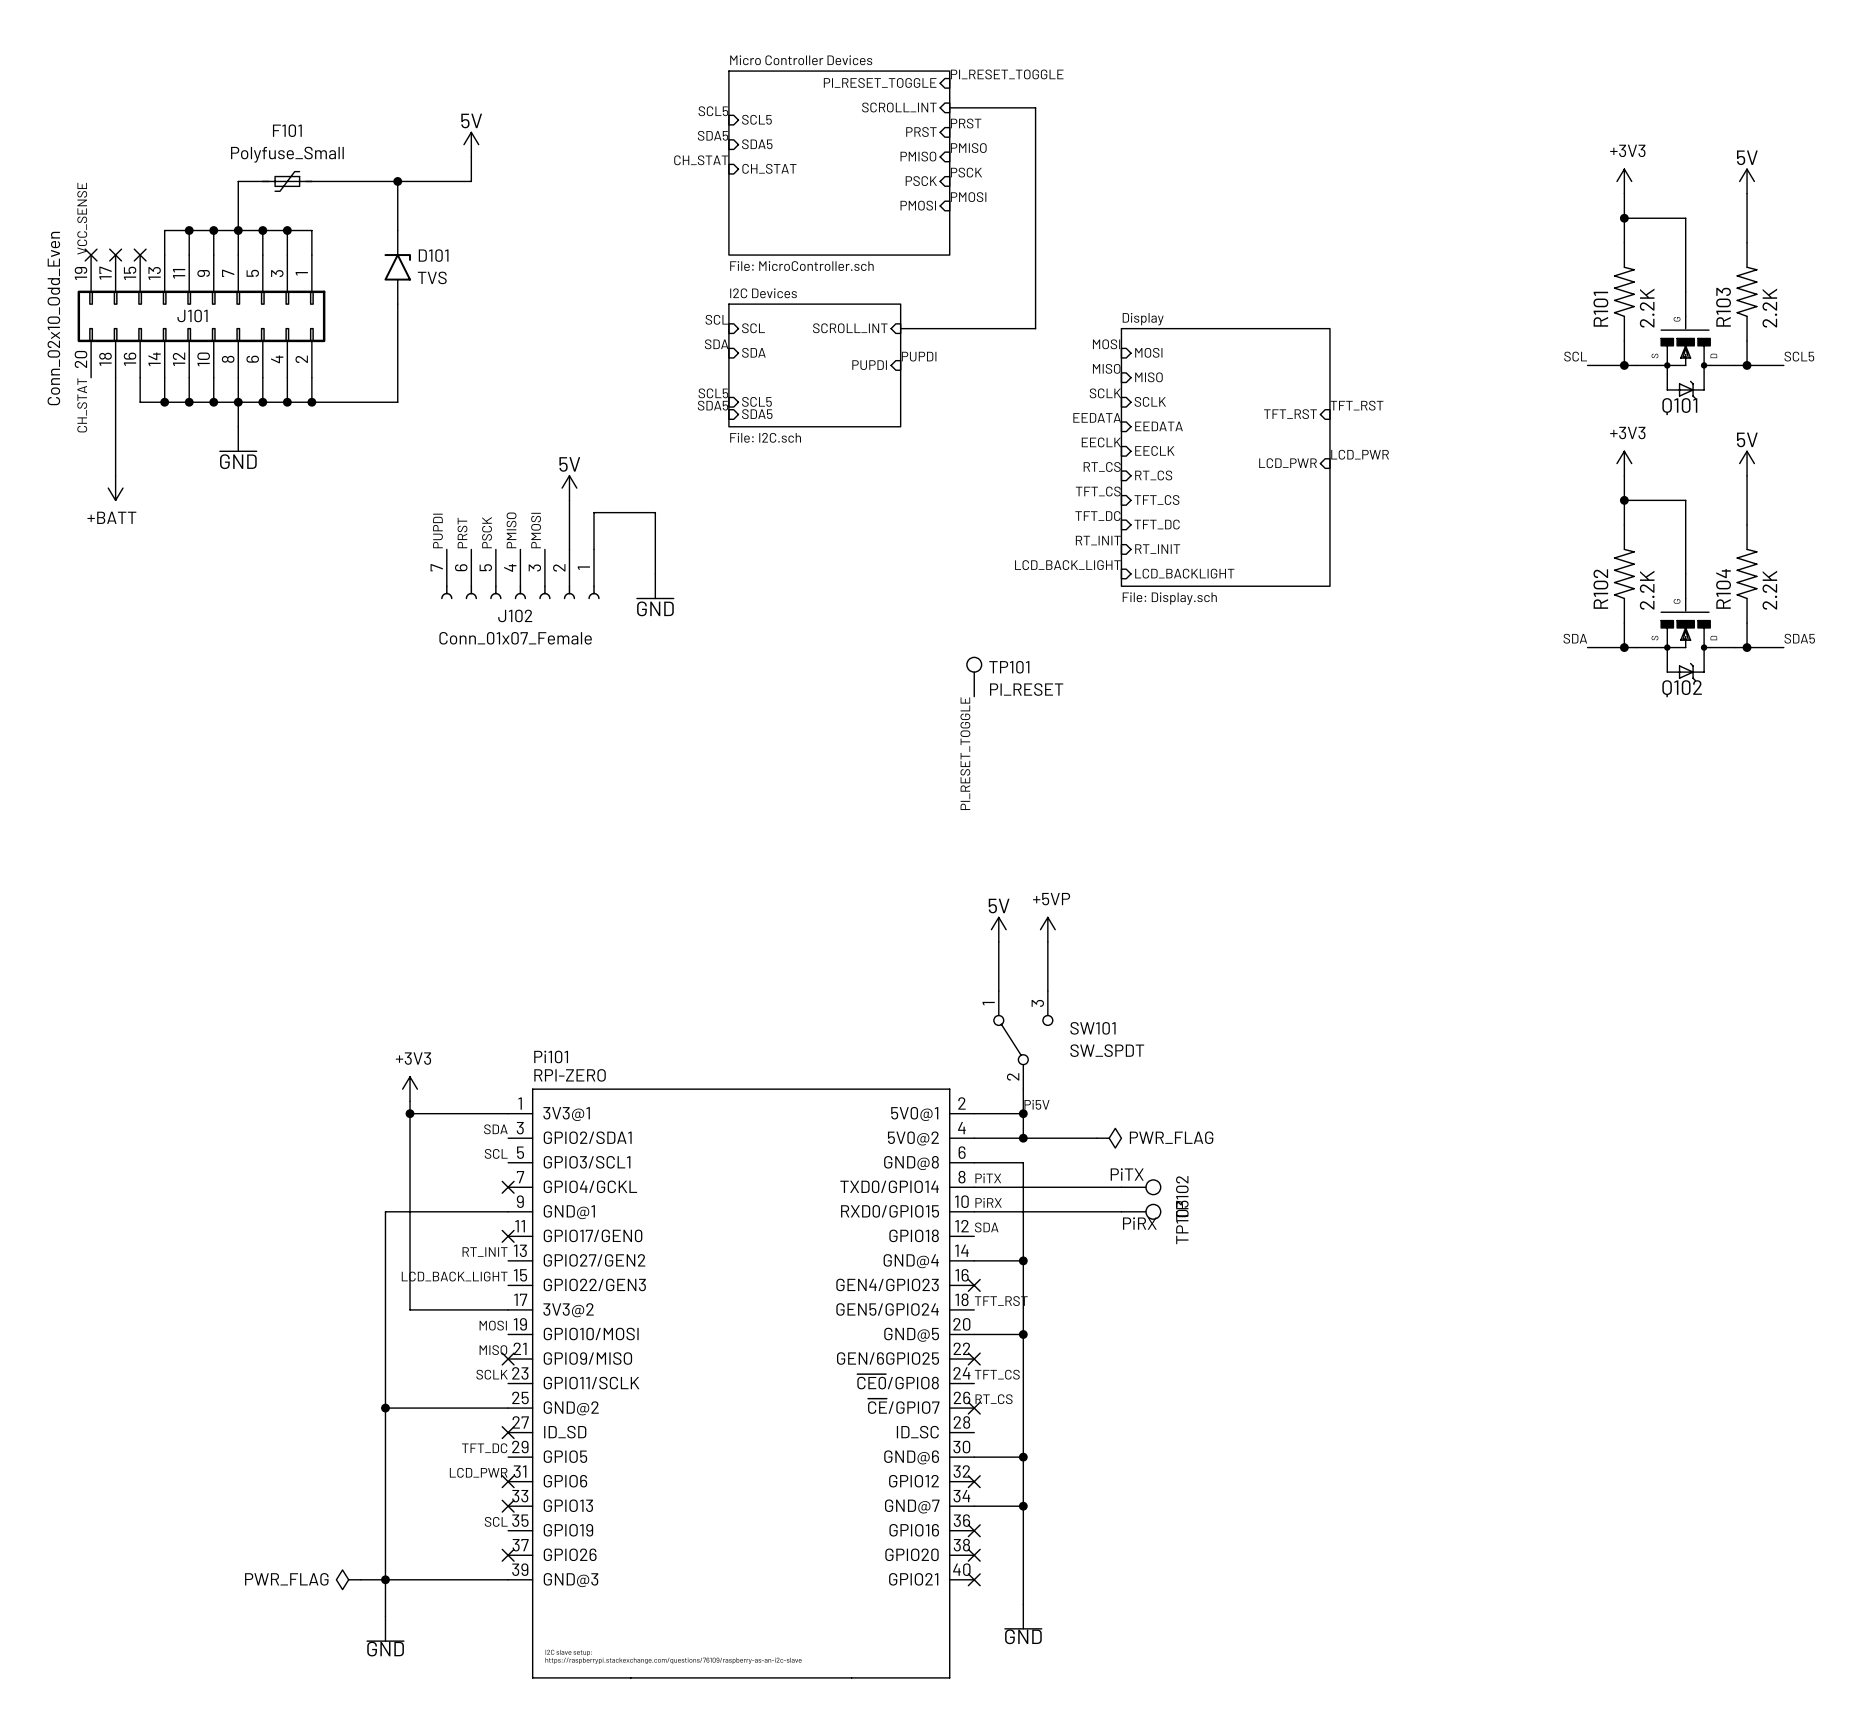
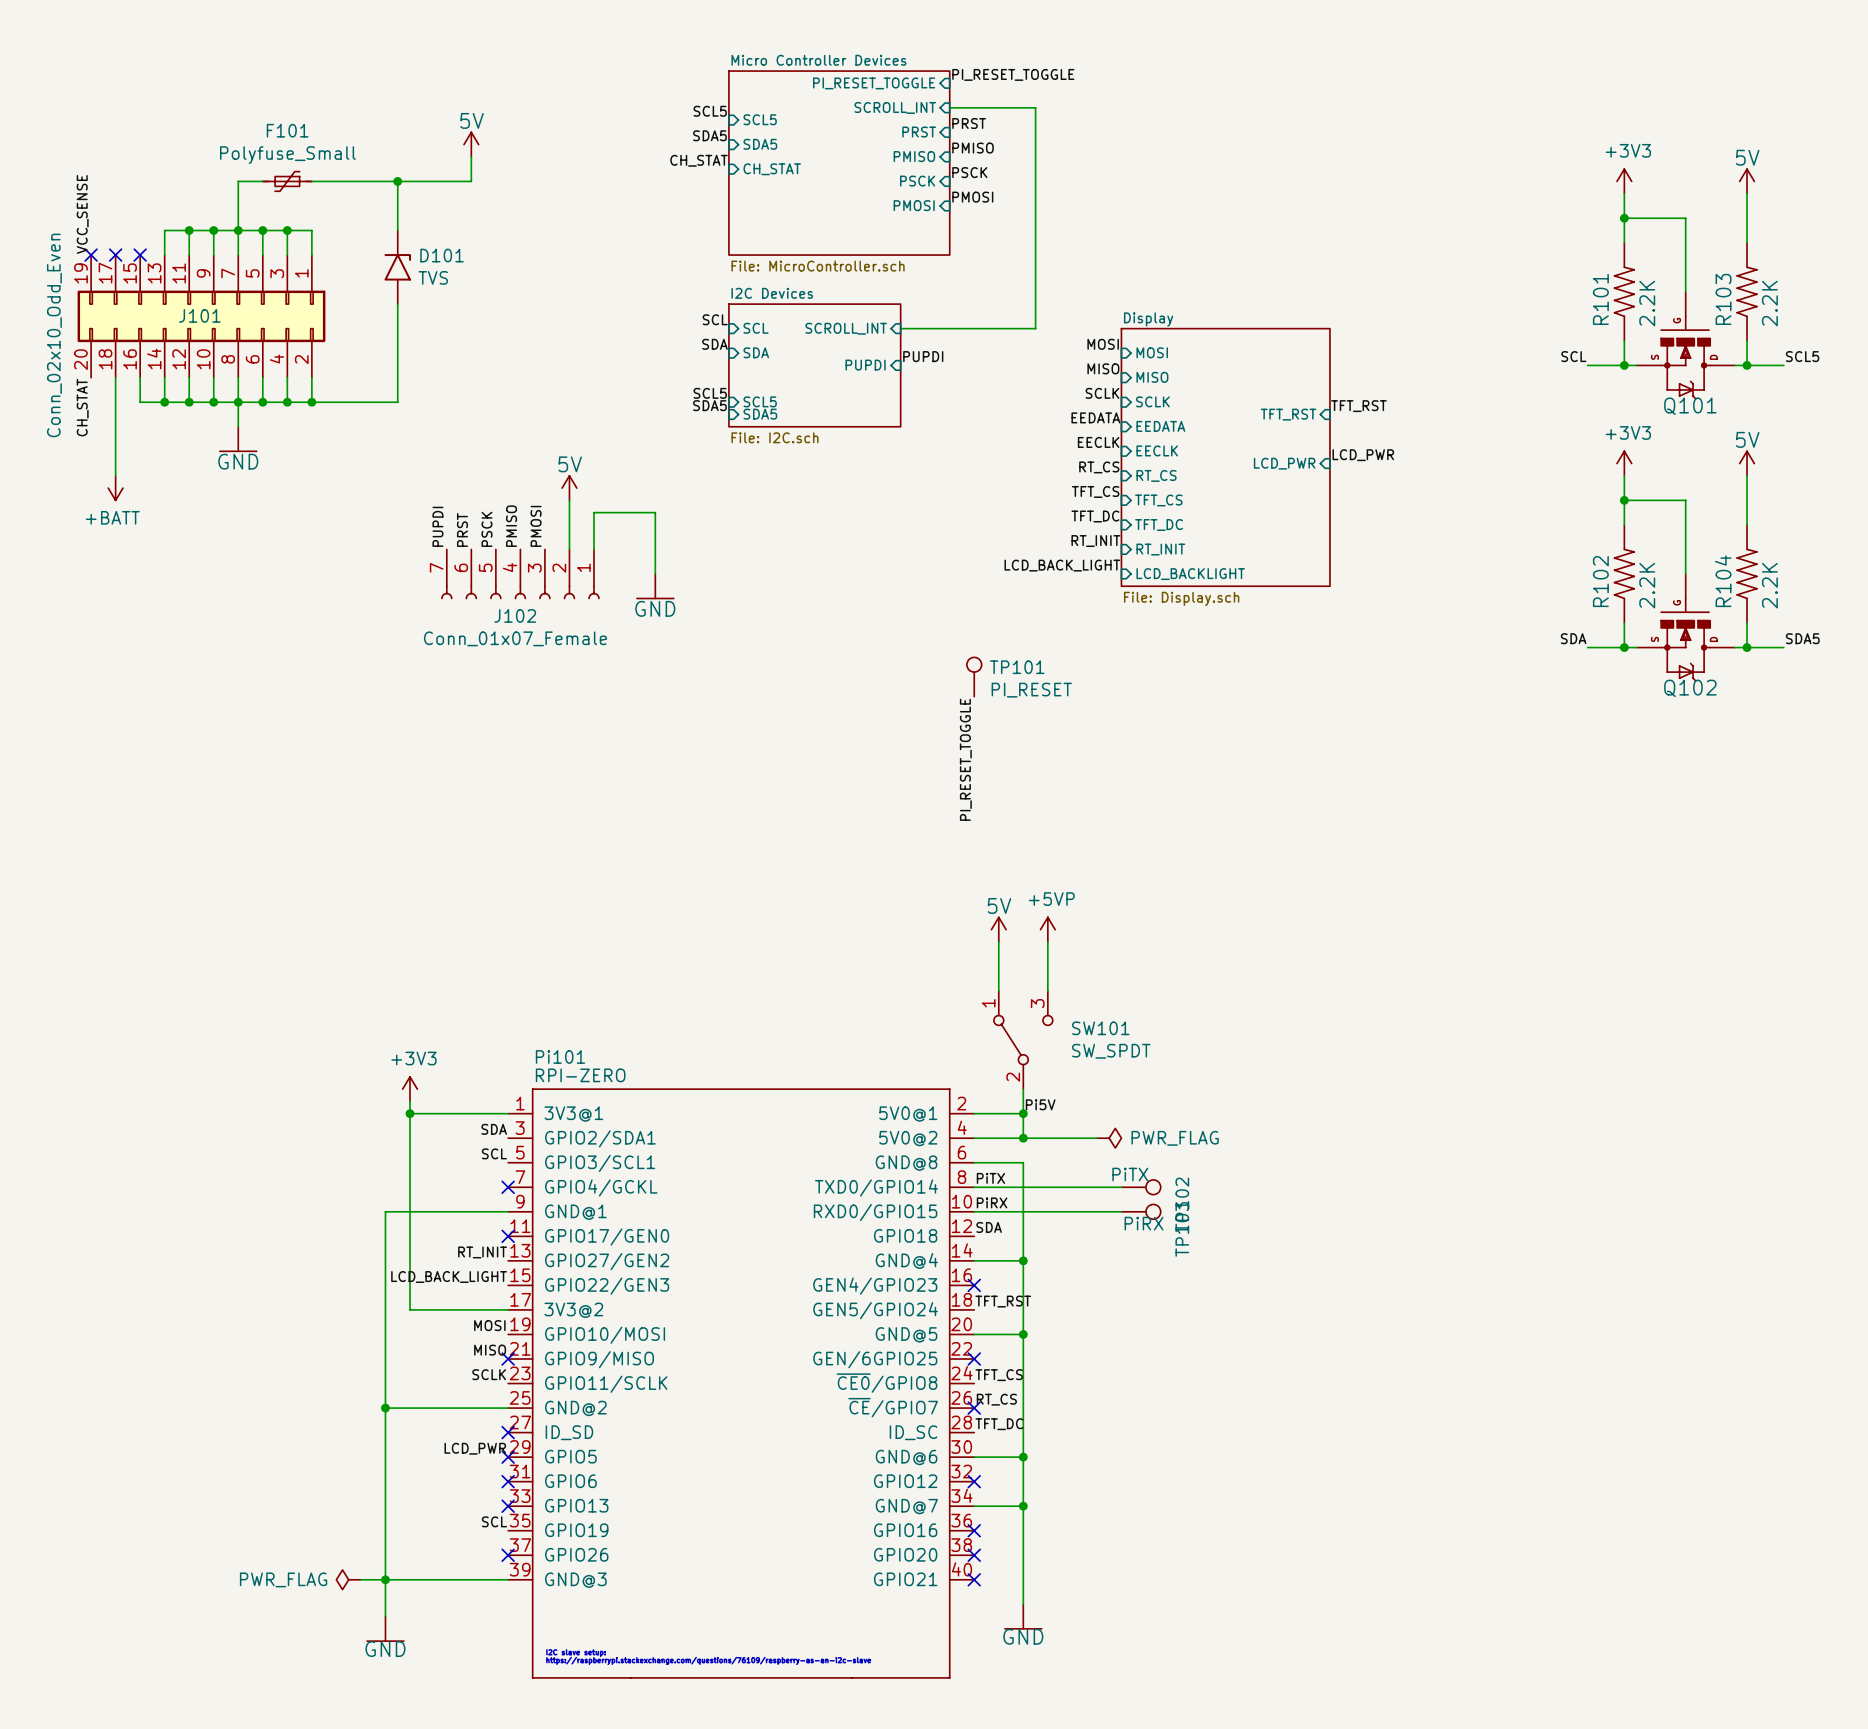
label: none -> TFT_DC (999, 1424)
label: TFT_DC (484, 1448) -> LCD_PWR (475, 1448)
no-connect mark: none -> (508, 1457)
label: LCD_PWR (478, 1472) -> none

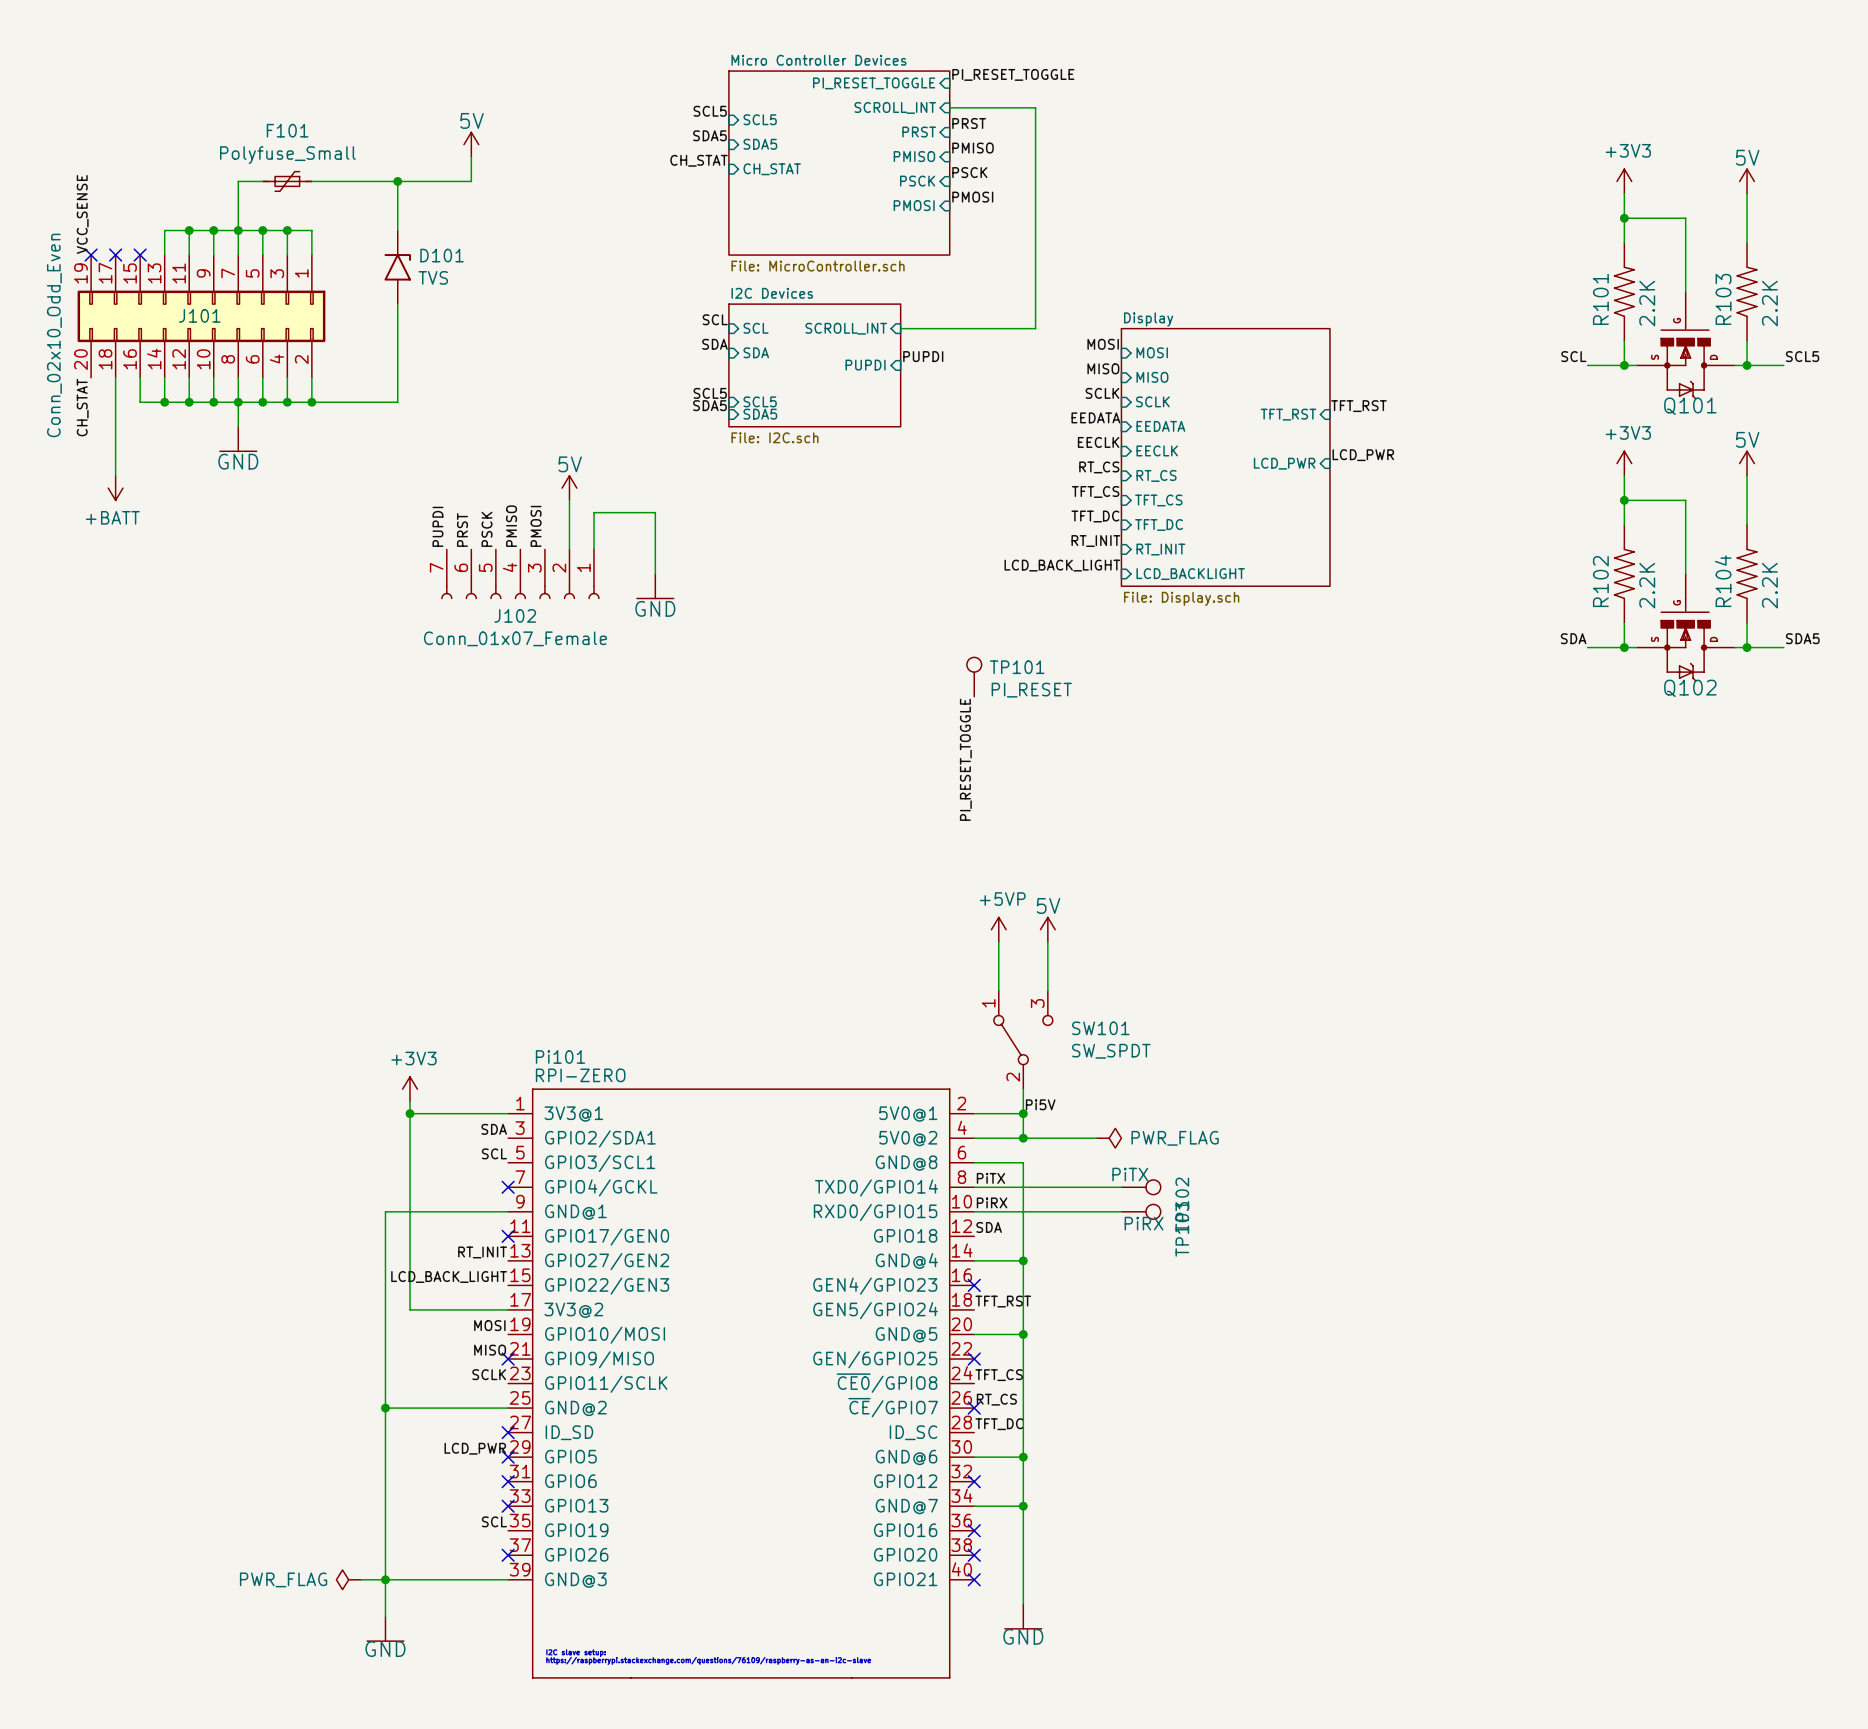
power symbol: 5V (998, 929) -> +5VP (998, 929)
power symbol: +5VP (1047, 929) -> 5V (1047, 929)

